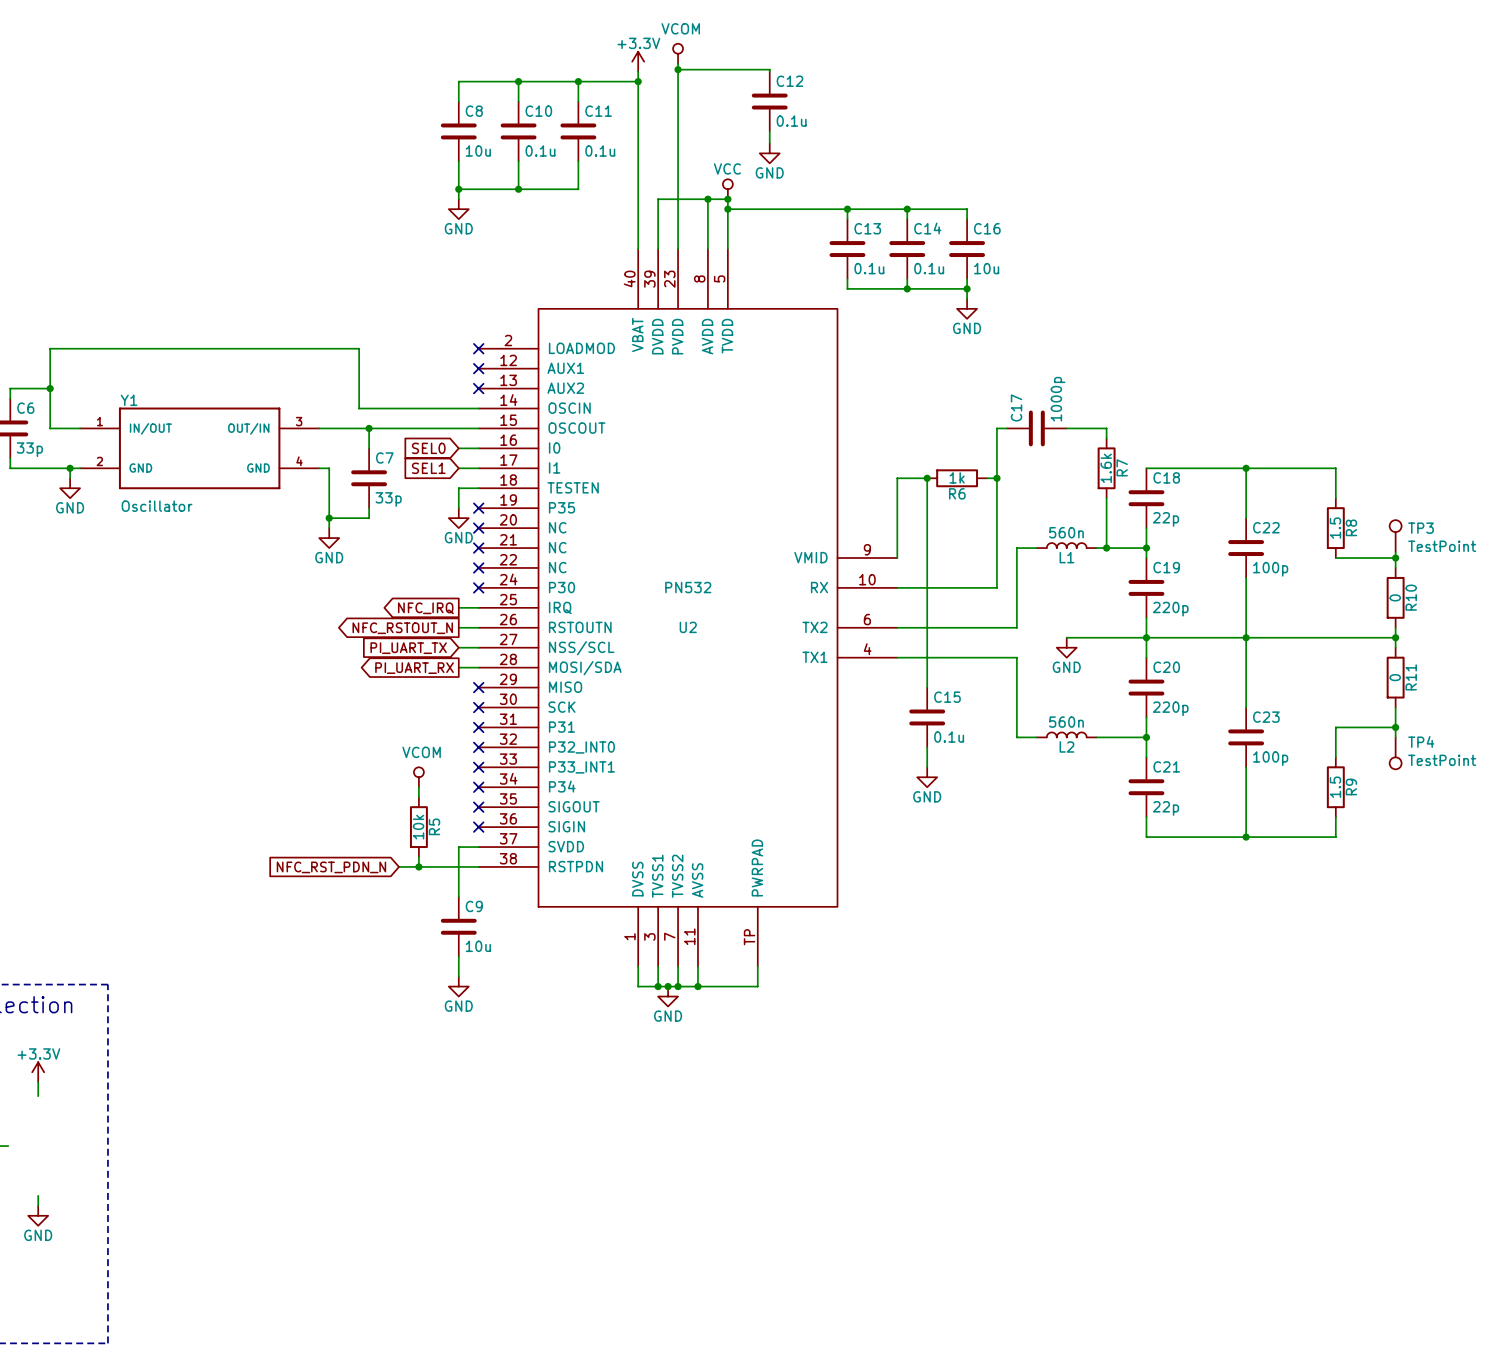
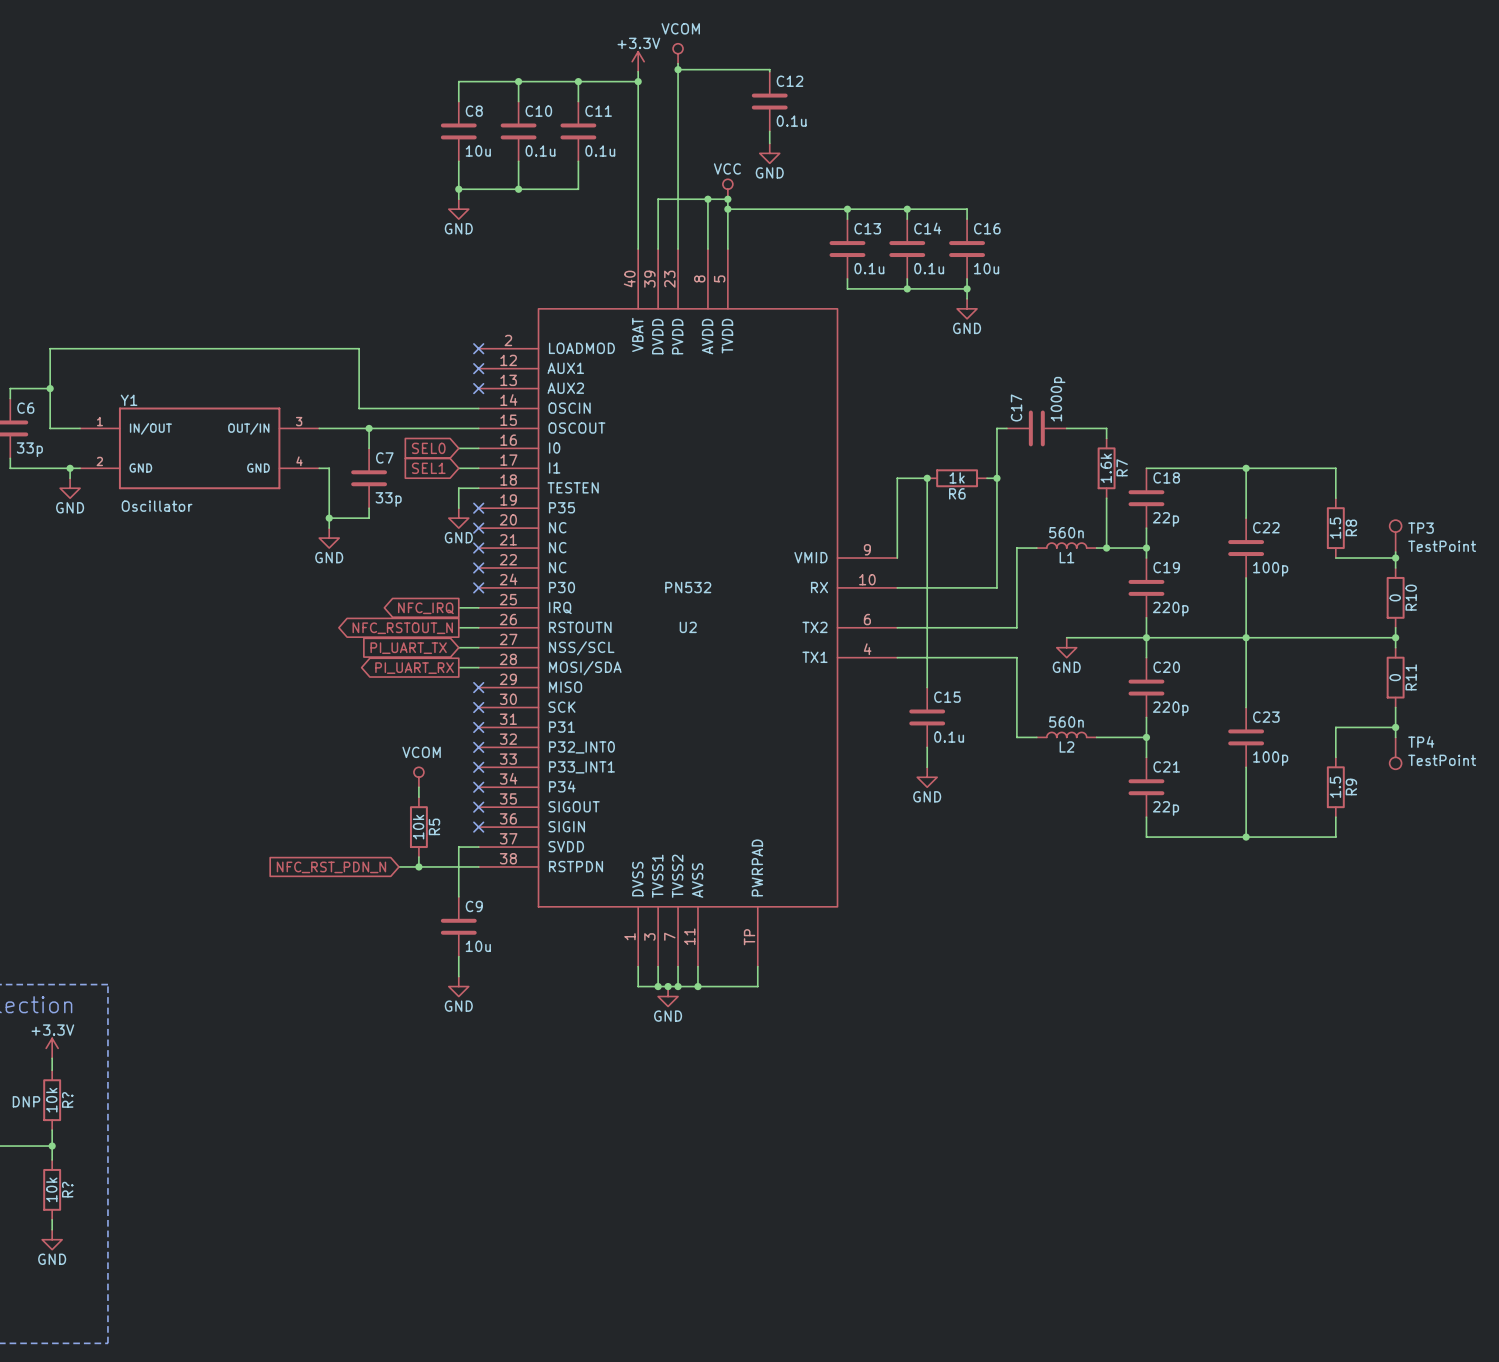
wire: none -> (52, 1058) (52, 1070)
power symbol position: +3.3V (38, 1072) -> +3.3V (52, 1048)
wire: (38, 1082) (38, 1096) -> none
R?: none -> 10k (52, 1100)
wire: none -> (52, 1130) (52, 1159)
wire: none -> (8, 1146) (52, 1146)
junction: none -> (52, 1146)
R?: none -> 10k (52, 1189)
wire: (38, 1195) (38, 1205) -> (52, 1219) (52, 1229)
power symbol position: GND (38, 1215) -> GND (52, 1239)

